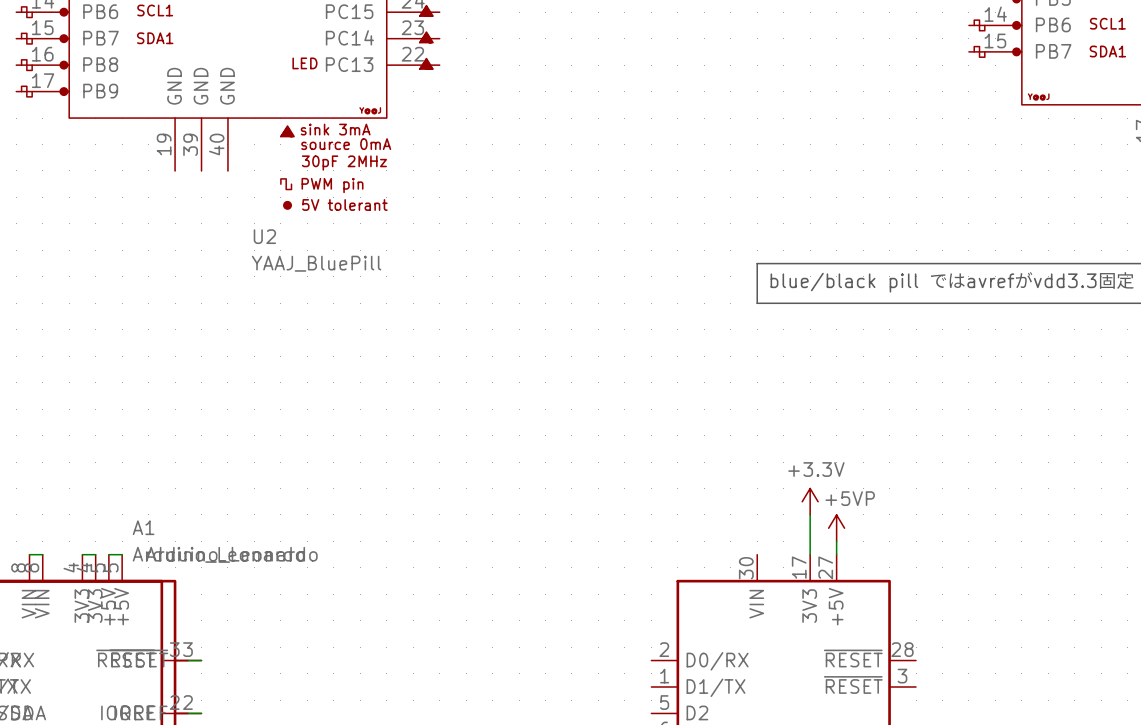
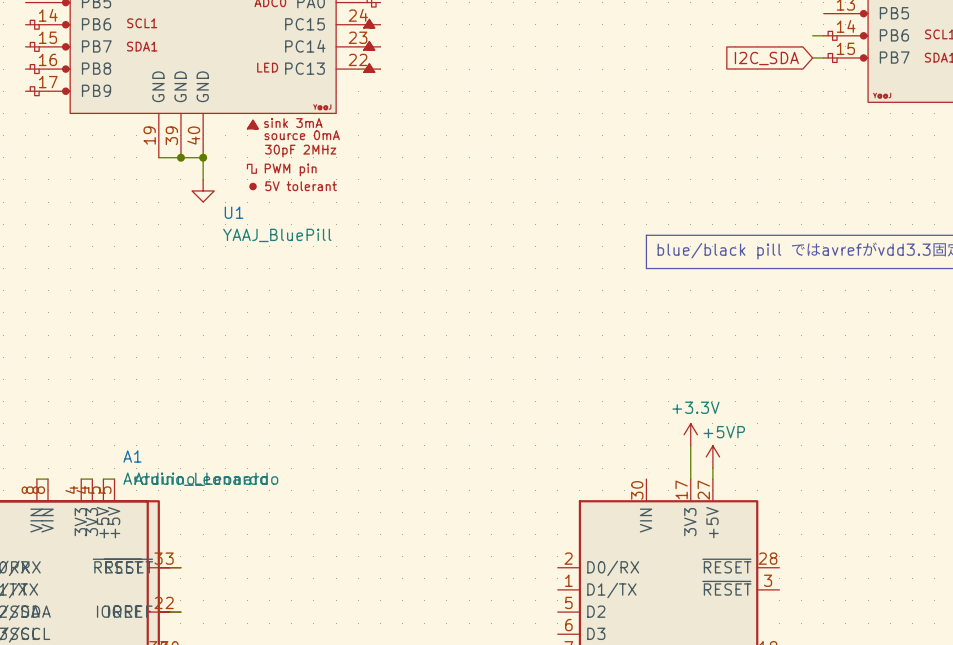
wire: none -> (812, 35) (823, 35)
wire: none -> (812, 57) (823, 57)
global label: none -> I2C_SDA (766, 58)
wire: none -> (158, 157) (203, 157) (203, 179)
junction: none -> (180, 157)
junction: none -> (203, 157)
power symbol: none -> (203, 190)
U2 name: U2 (264, 236) -> U1 (234, 212)

